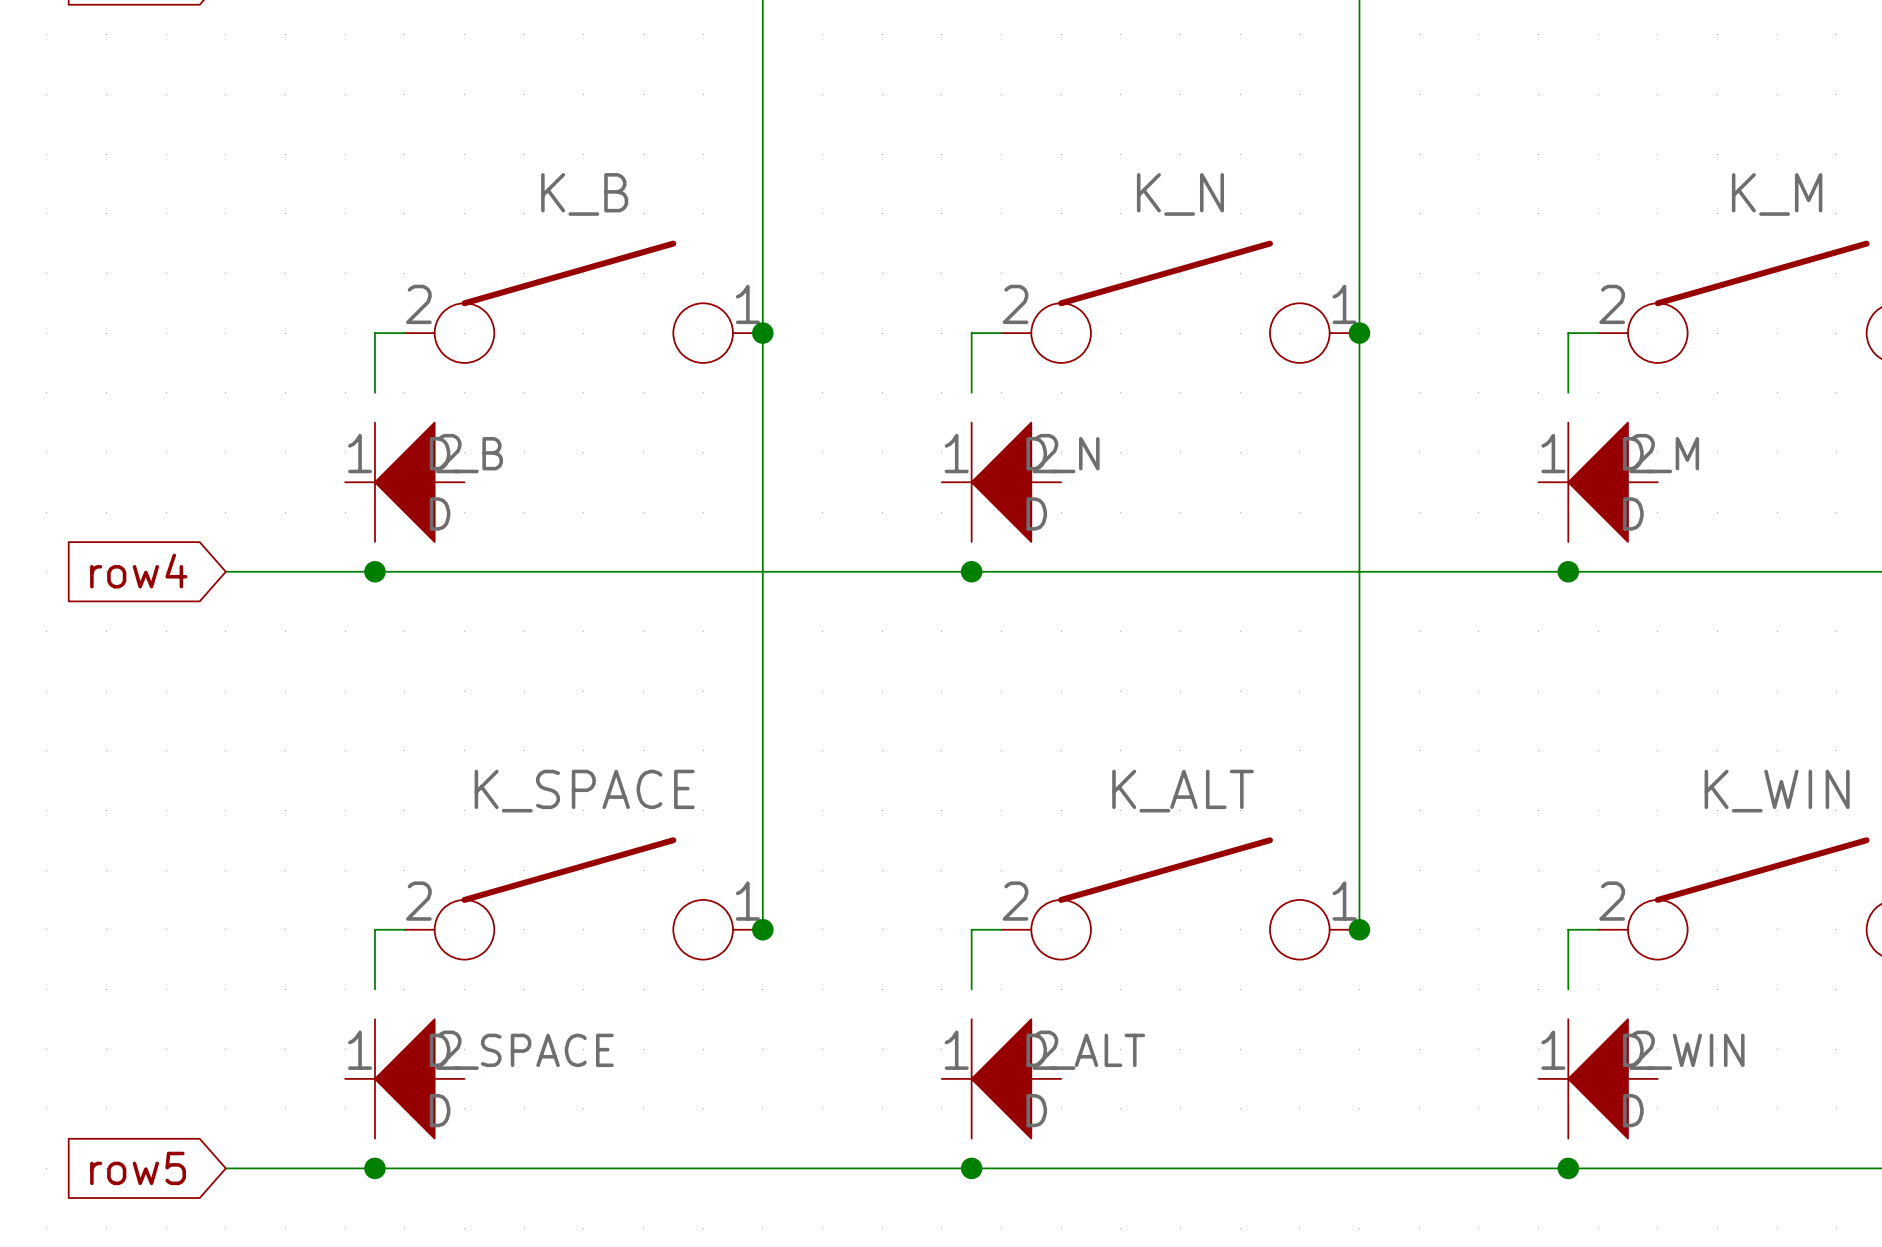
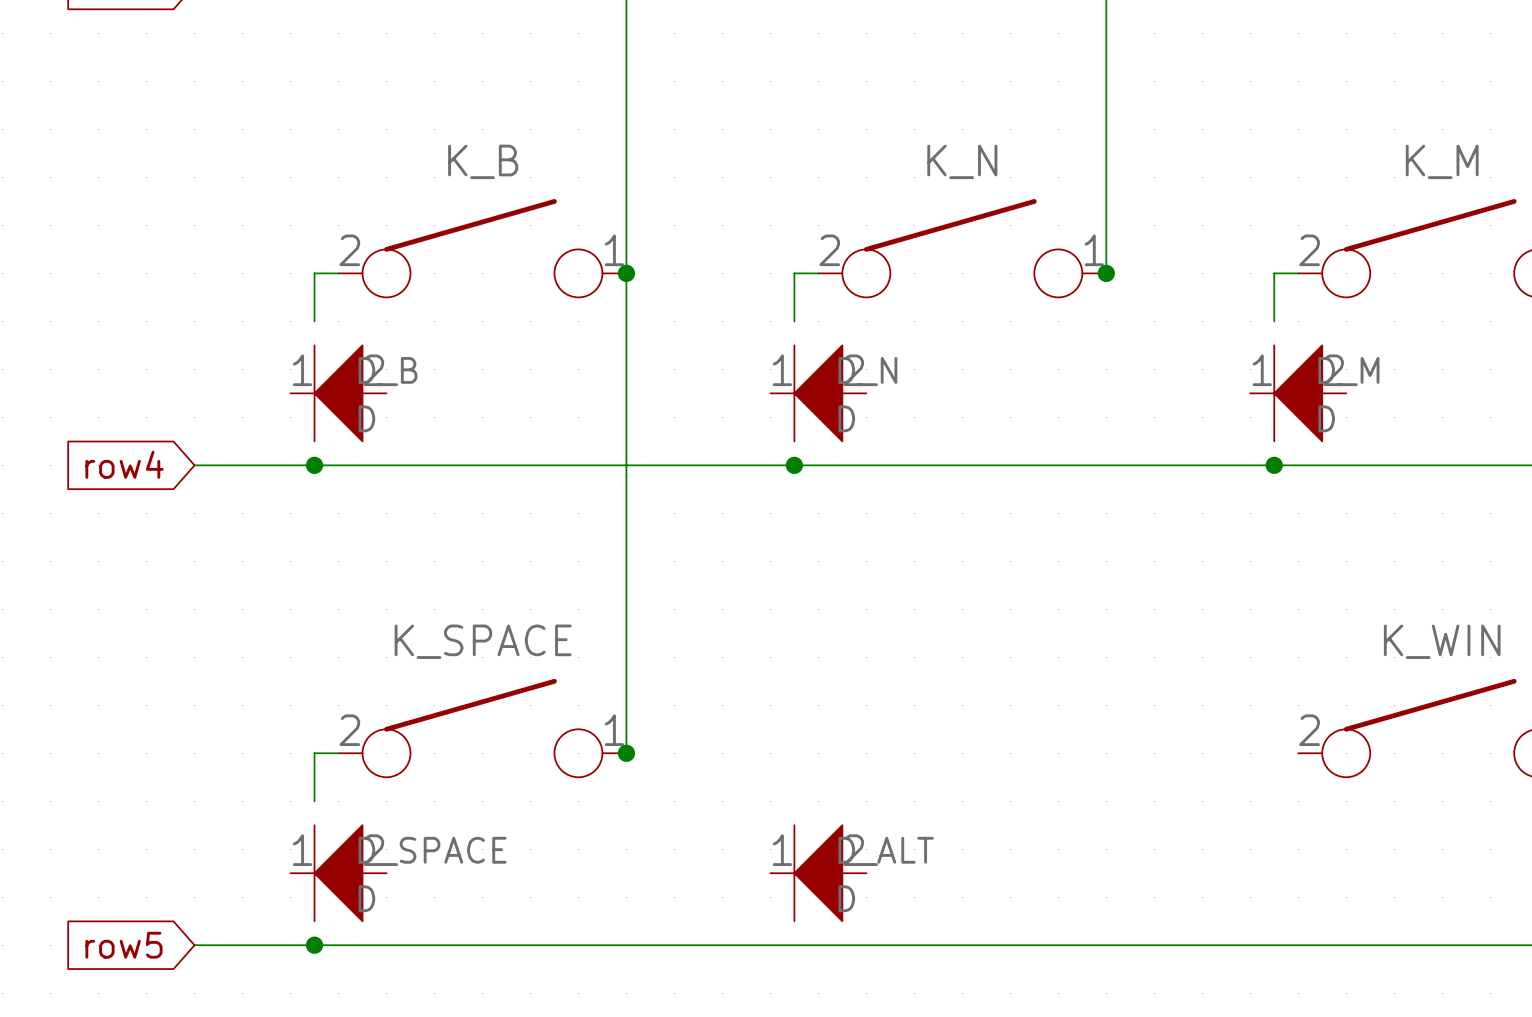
wire: (1359, 333) (1359, 929) -> none
K_ALT: (1180, 898) -> none
wire: (1001, 929) (971, 929) (971, 989) -> none
junction: (1359, 929) -> none
wire: (1598, 929) (1568, 929) (1568, 989) -> none
D_WIN: D (1598, 1078) -> none
junction: (971, 1168) -> none
junction: (1568, 1168) -> none

